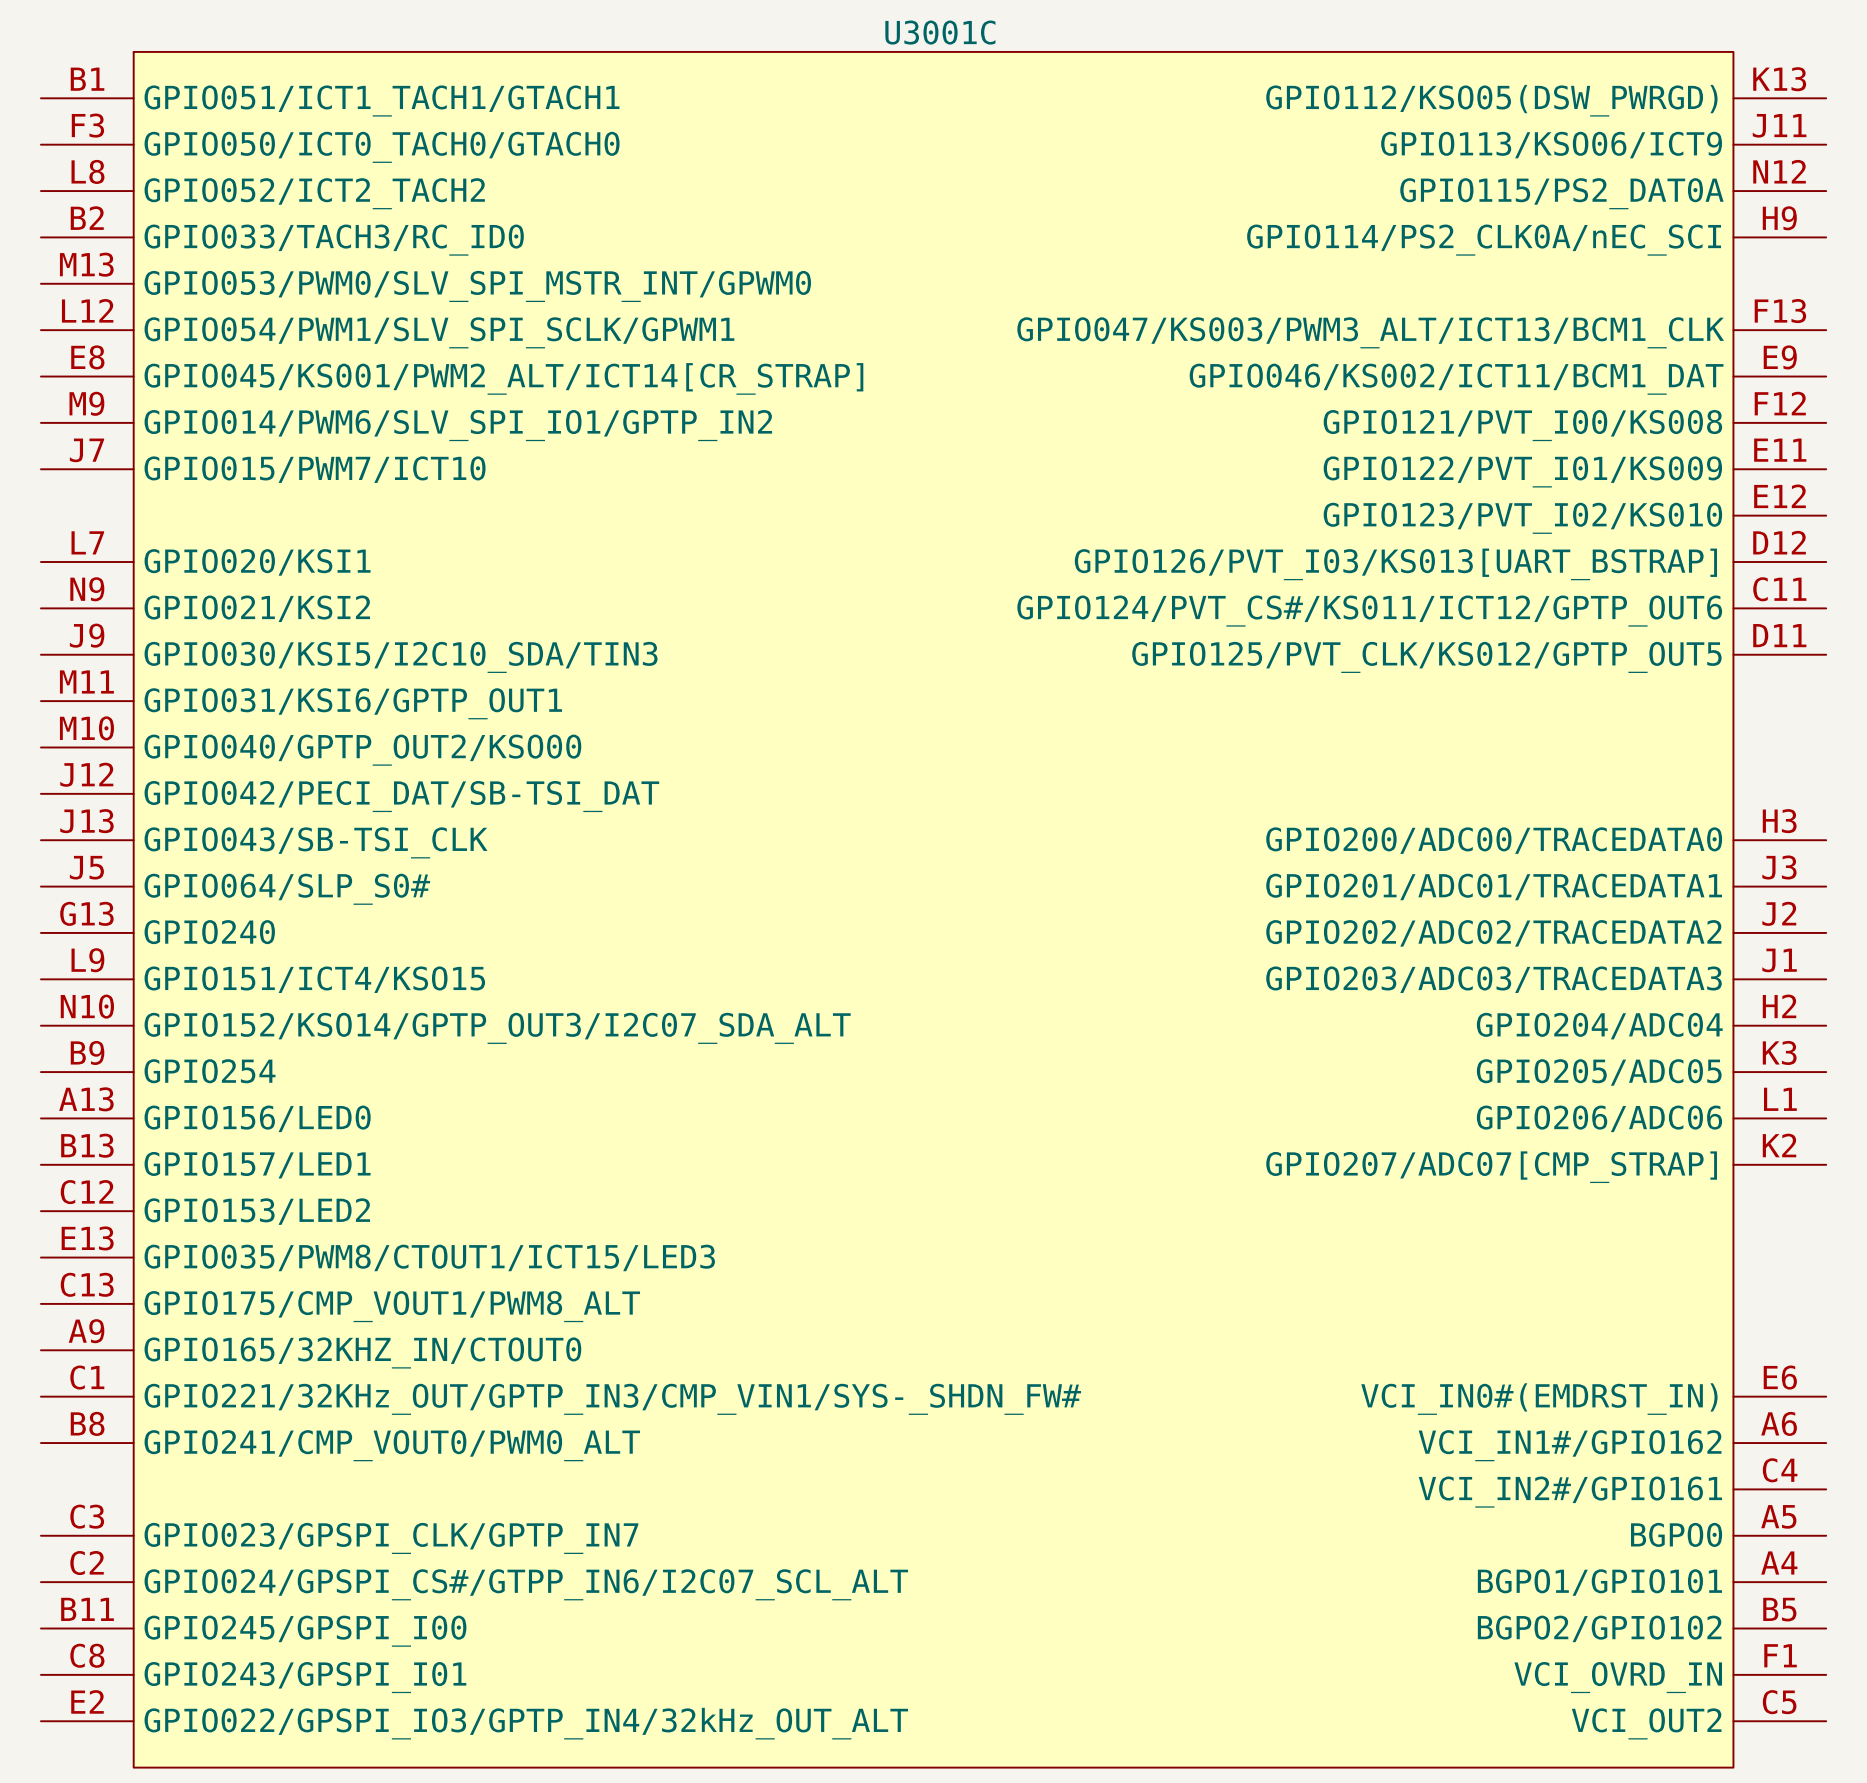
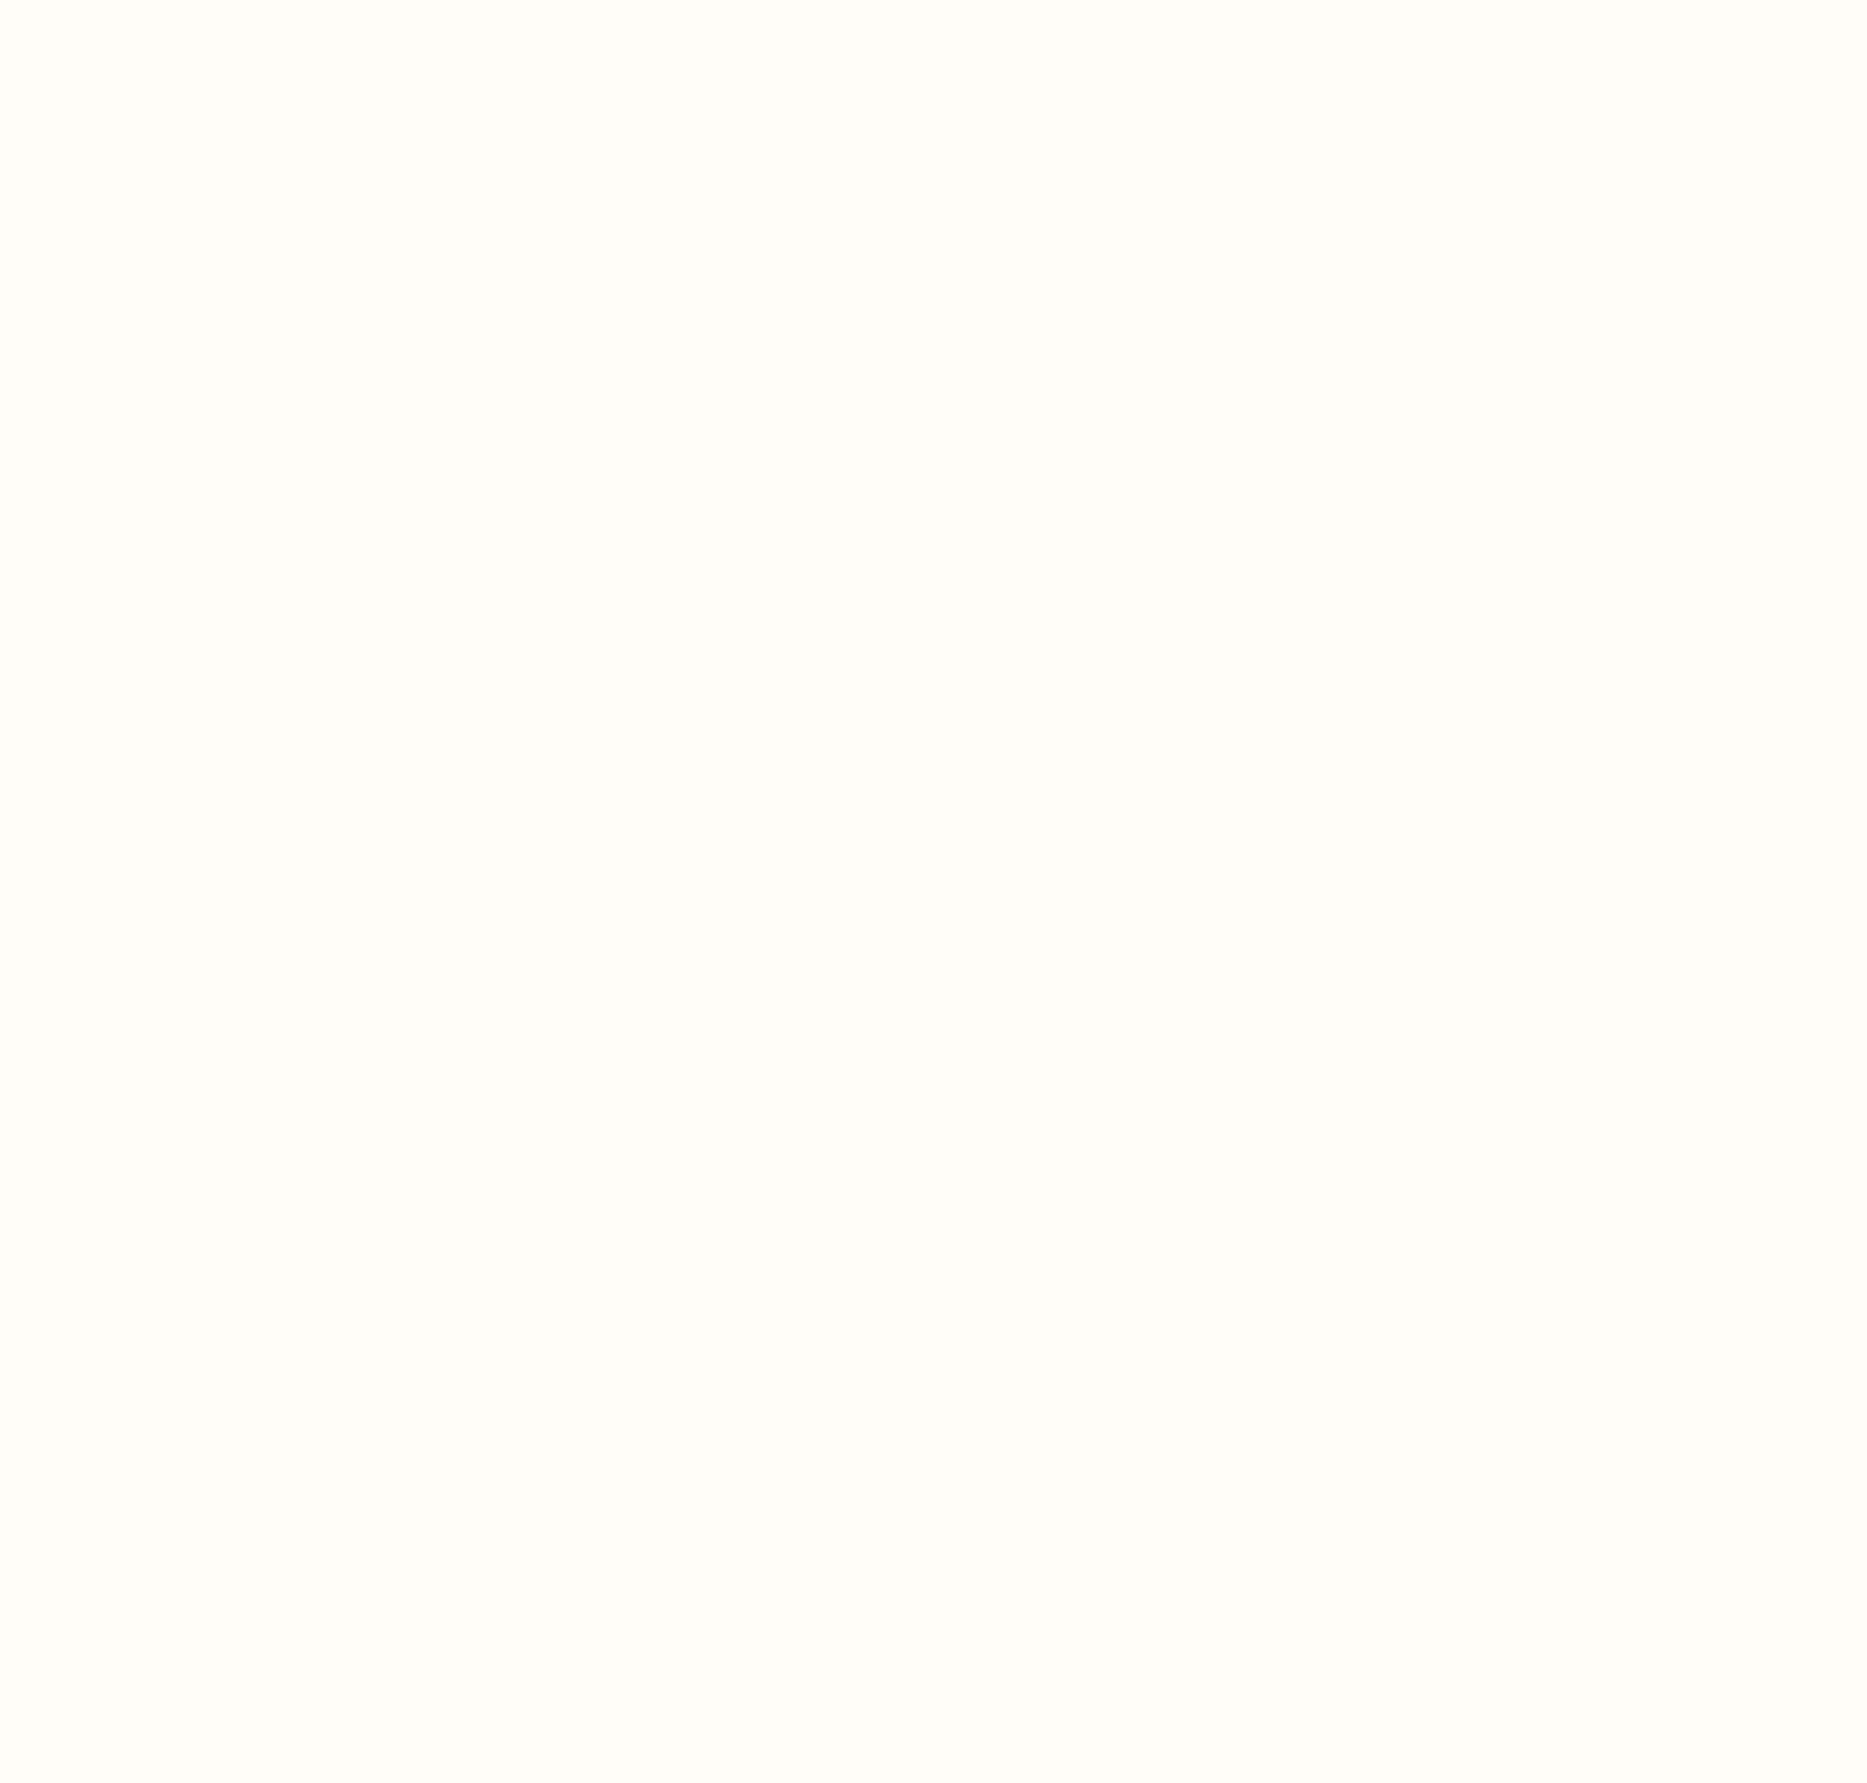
U3001C: (933, 909) -> none

